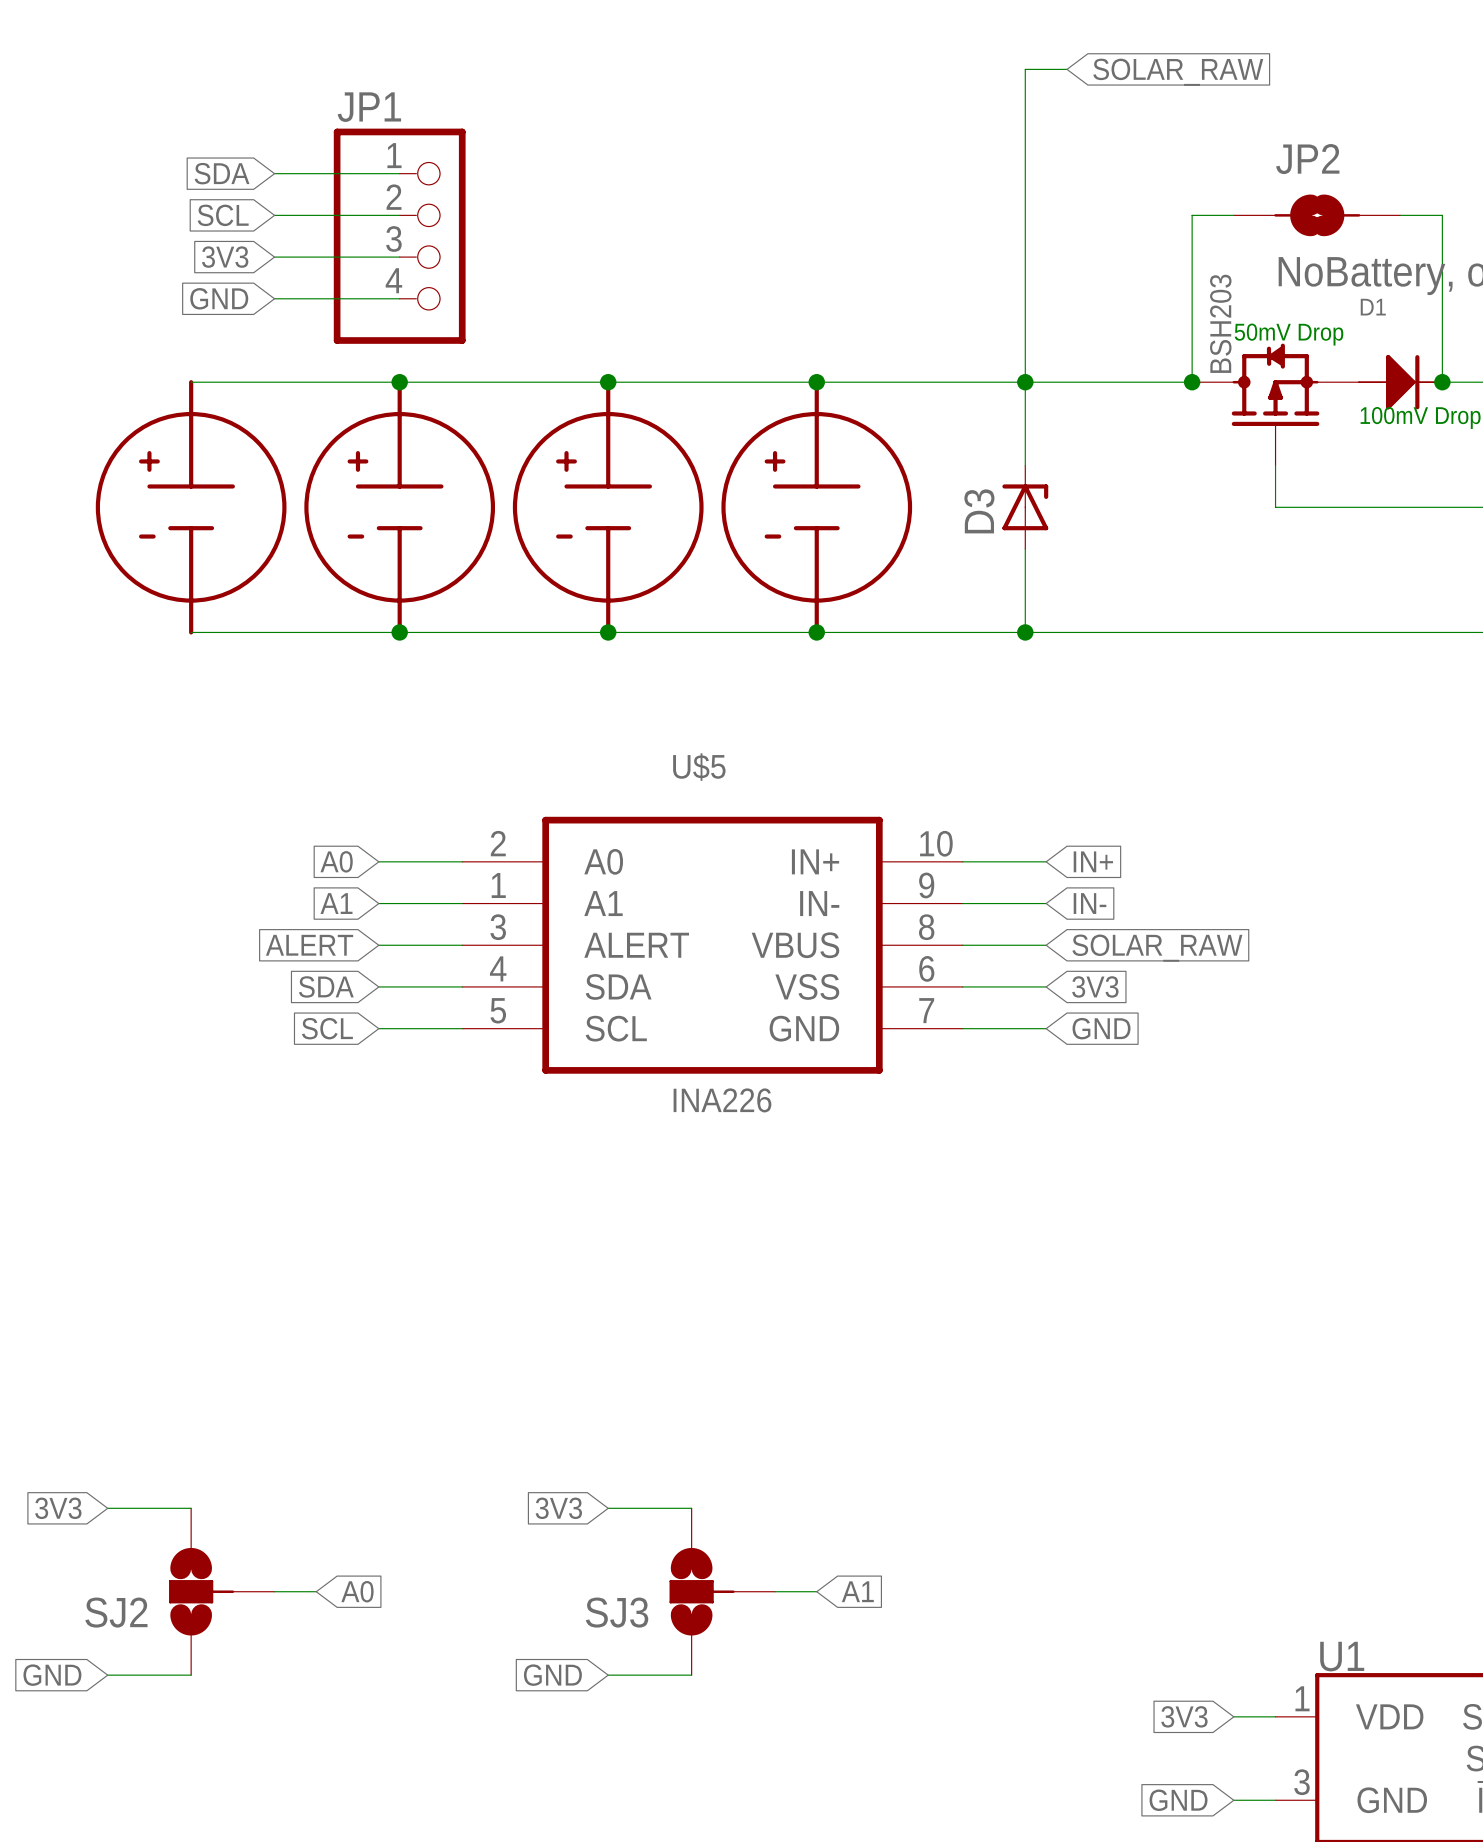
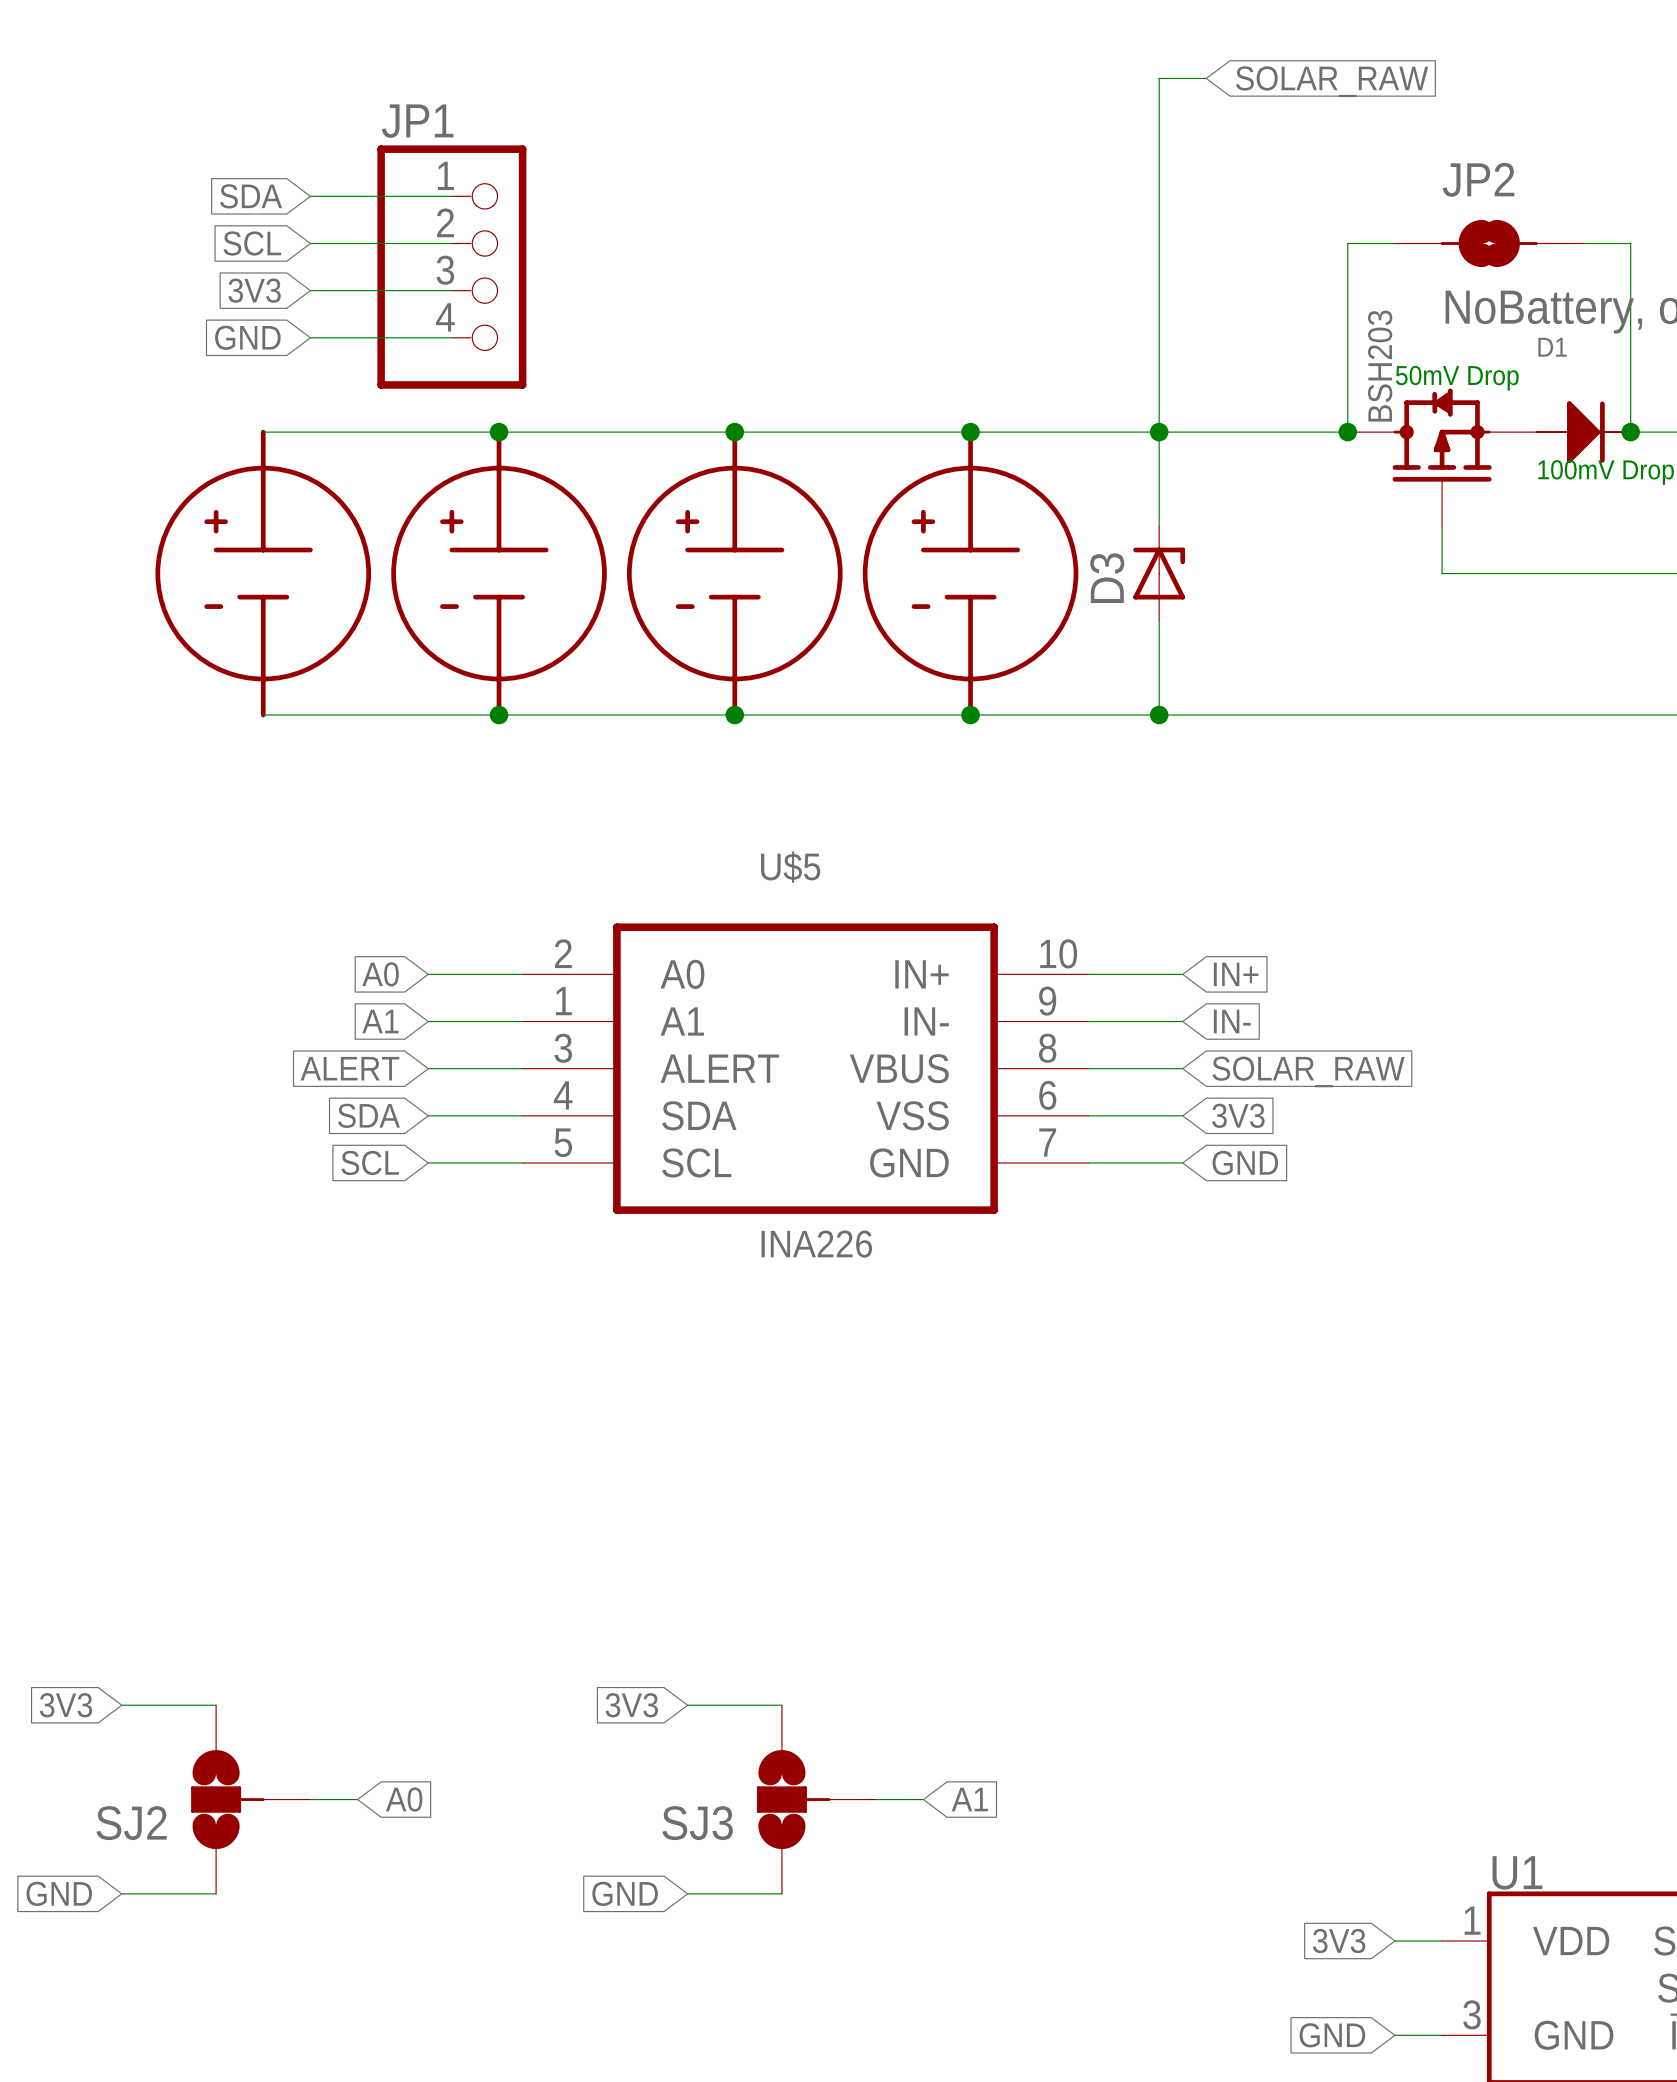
wire: (191, 382) (232, 382) -> none
junction position: (399, 382) -> (499, 432)
junction position: (608, 382) -> (734, 432)
junction position: (816, 382) -> (970, 432)
part position: (191, 507) -> (263, 573)
part position: (399, 507) -> (499, 573)
part position: (608, 507) -> (734, 573)
part position: (816, 507) -> (970, 573)
wire: (191, 632) (232, 632) -> none
junction position: (399, 632) -> (499, 715)
junction position: (608, 632) -> (734, 715)
junction position: (816, 632) -> (970, 715)

